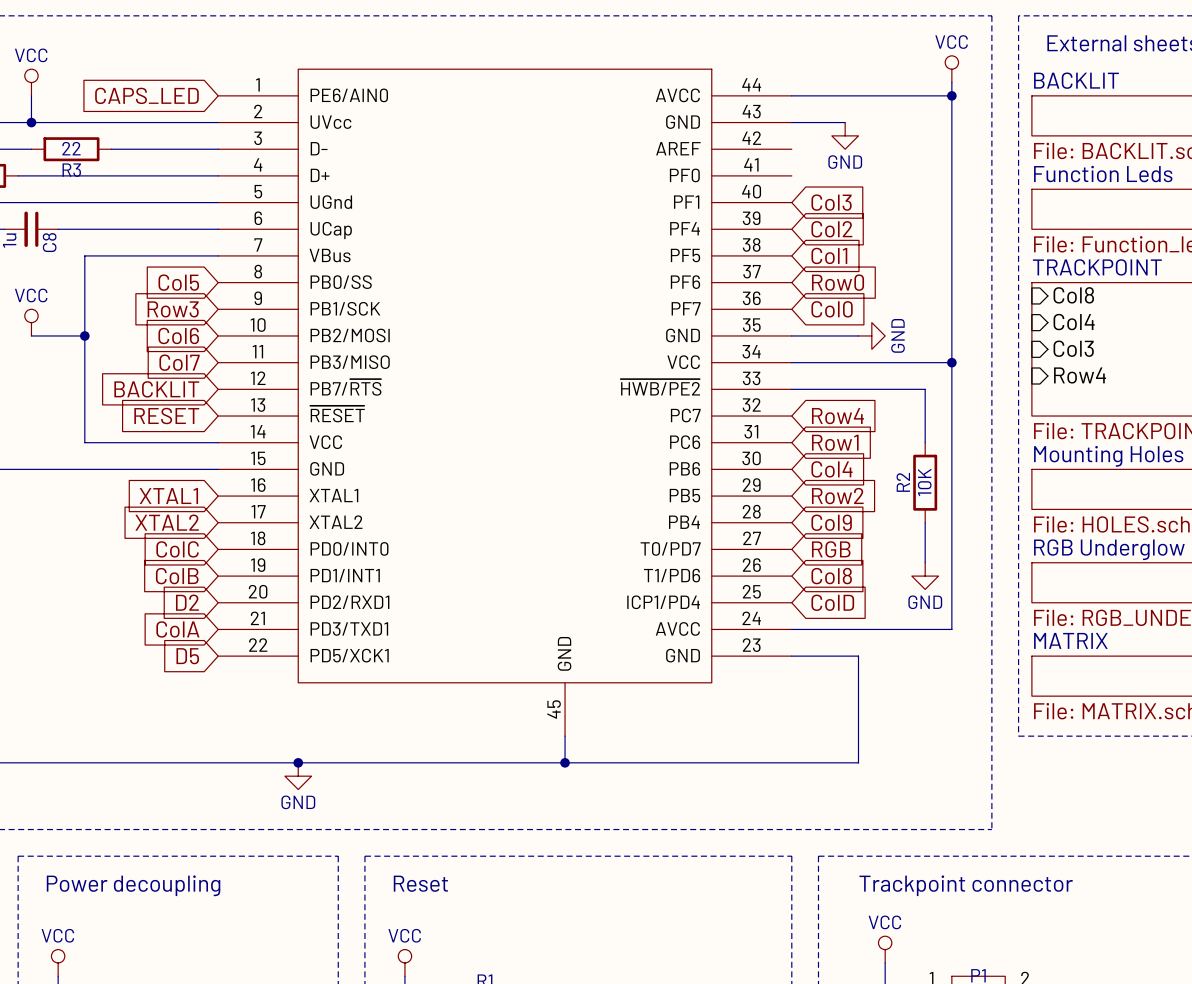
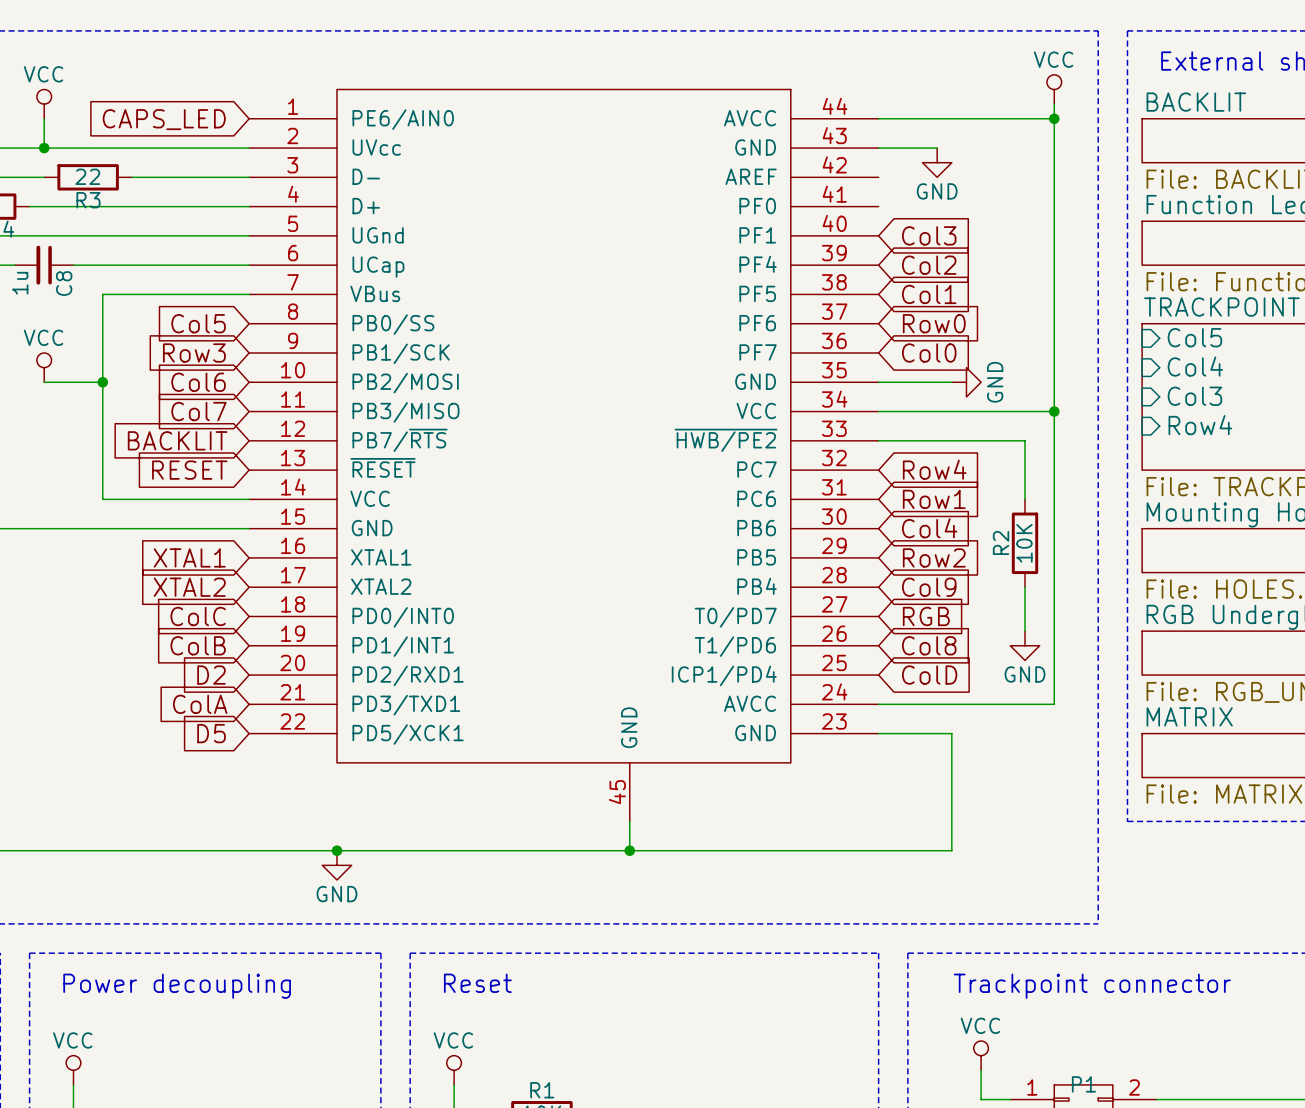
sheet pin: Col8 (1073, 295) -> Col5 (1194, 337)

